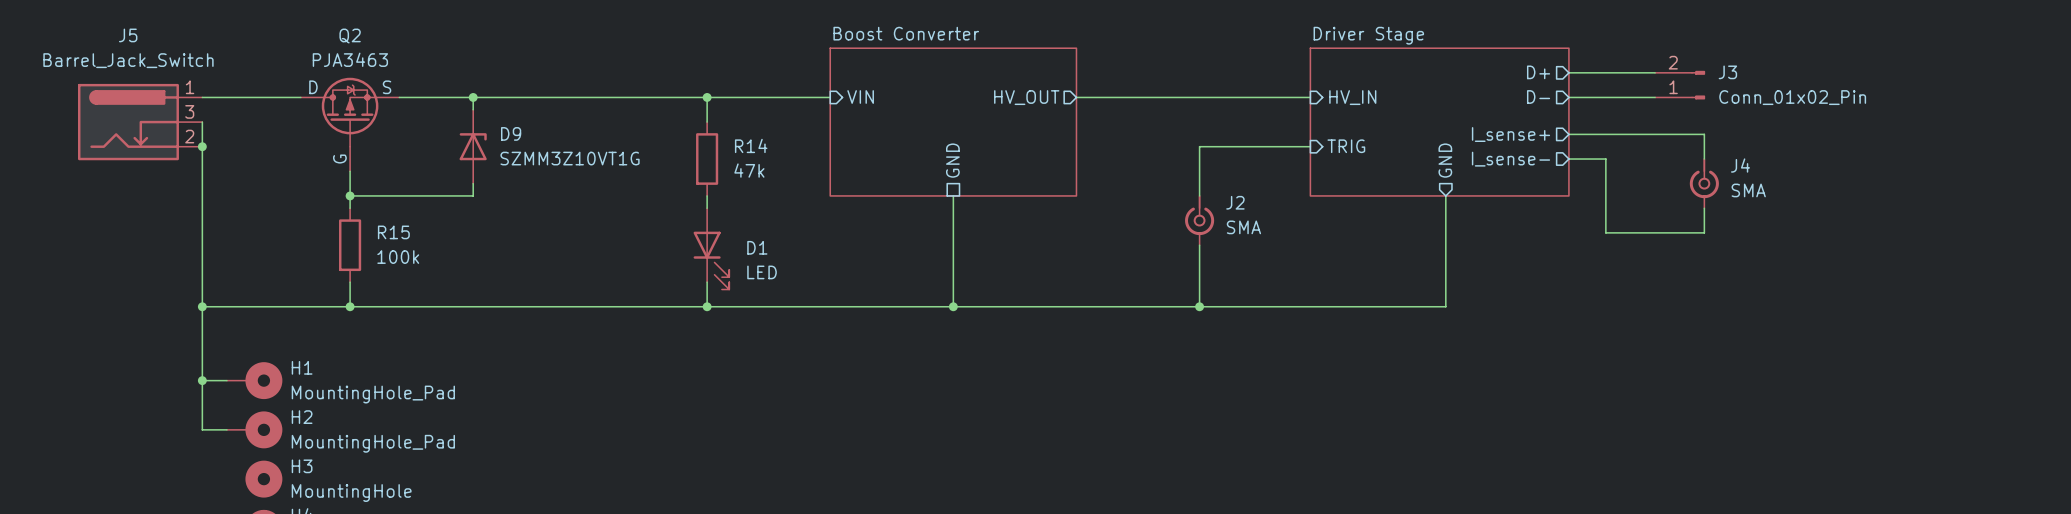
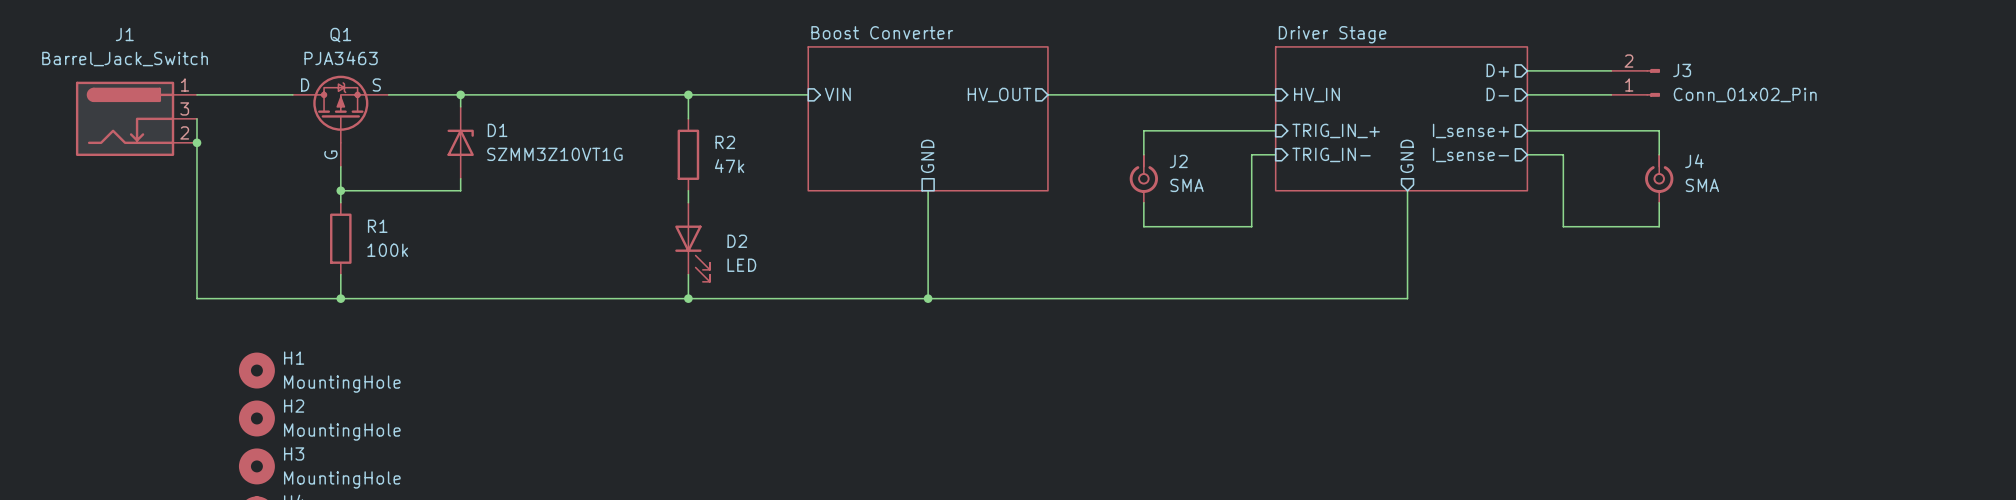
J5 name: J5 (128, 35) -> J1 (124, 34)
Q2 name: Q2 (350, 36) -> Q1 (340, 35)
D9 name: D9 (511, 133) -> D1 (497, 130)
wire: none -> (1275, 130) (1143, 130) (1143, 154)
sheet pin: none -> TRIG_IN_+ (1336, 130)
R14 name: R14 (751, 145) -> R2 (725, 142)
wire: (1310, 146) (1199, 146) (1199, 195) -> none
sheet pin: TRIG (1346, 146) -> none
wire: none -> (1275, 154) (1251, 154) (1251, 226) (1143, 226) (1143, 202)
sheet pin: none -> TRIG_IN- (1331, 154)
J2 position: (1199, 220) -> (1143, 178)
R15 name: R15 (393, 232) -> R1 (377, 226)
wire: (1199, 245) (1199, 306) -> none
D1 name: D1 (757, 247) -> D2 (737, 241)
wire: (202, 306) (202, 429) (226, 429) -> none
junction: (202, 306) -> none
junction: (1199, 306) -> none
H1 symbol: [226, 362, 283, 400] -> [238, 352, 275, 389]
wire: (202, 380) (226, 380) -> none
junction: (202, 380) -> none
H1 value: MountingHole_Pad (373, 394) -> MountingHole (342, 384)
H2 symbol: [226, 411, 283, 449] -> [238, 400, 275, 437]
H2 value: MountingHole_Pad (373, 443) -> MountingHole (342, 432)

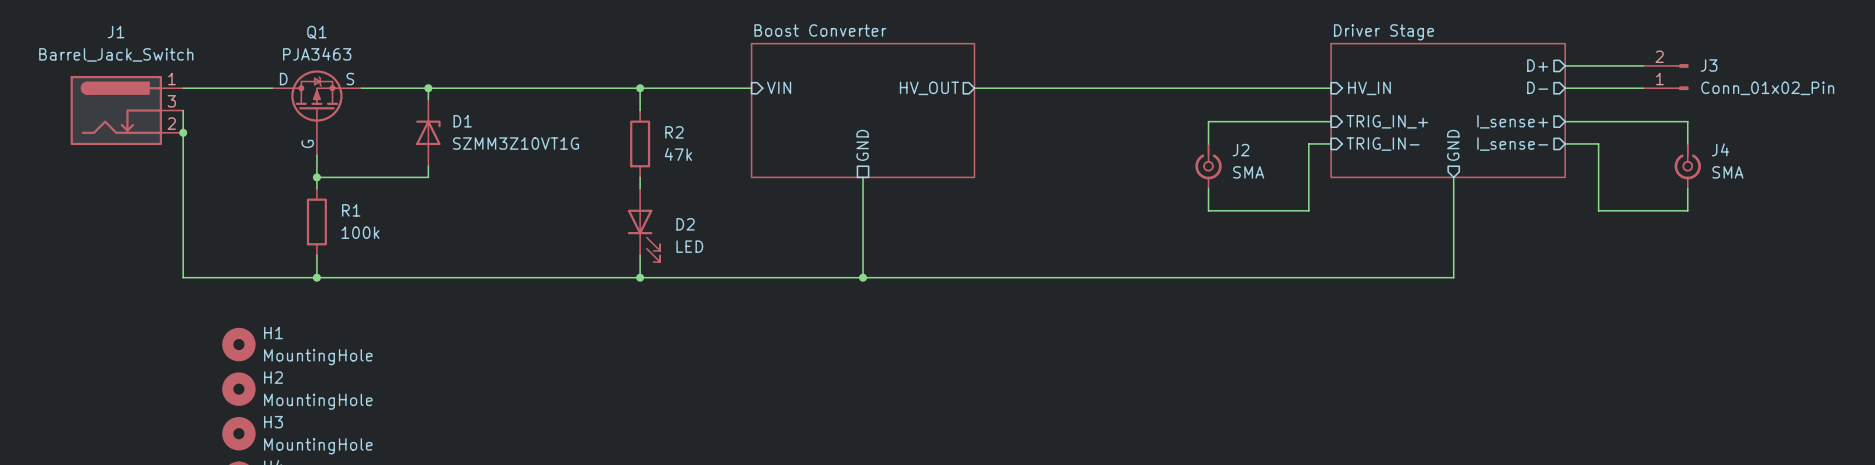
sheet pin position: D+ (1497, 70) -> D+ (1537, 65)
wire: (1527, 70) (1611, 70) -> (1565, 65) (1643, 65)
J3 position: (1635, 82) -> (1665, 77)
wire: none -> (1186, 88) (1331, 88)
sheet pin position: D- (1497, 94) -> D- (1537, 87)
wire: (1527, 94) (1611, 94) -> (1565, 88) (1643, 88)
sheet pin position: HV_IN (1316, 95) -> HV_IN (1369, 88)
sheet Driver Stage position: (1401, 118) -> (1448, 110)
wire: (1275, 130) (1143, 130) (1143, 154) -> (1331, 121) (1208, 121) (1208, 143)
sheet pin position: TRIG_IN_+ (1336, 130) -> TRIG_IN_+ (1387, 121)
sheet pin position: I_sense+ (1470, 130) -> I_sense+ (1512, 121)
wire: (1527, 130) (1659, 130) (1659, 154) -> (1565, 121) (1687, 121) (1687, 143)
wire: (1275, 154) (1251, 154) (1251, 226) (1143, 226) (1143, 202) -> none
sheet pin position: TRIG_IN- (1331, 154) -> TRIG_IN- (1383, 144)
wire: none -> (1331, 143) (1308, 143) (1308, 177)
sheet pin position: I_sense- (1470, 154) -> I_sense- (1512, 144)
wire: (1527, 154) (1563, 154) (1563, 190) -> none
wire: none -> (1565, 143) (1598, 143) (1598, 210) (1687, 210) (1687, 188)
sheet pin position: GND (1407, 156) -> GND (1453, 145)
J2 position: (1143, 178) -> (1208, 166)
J4 position: (1659, 178) -> (1687, 166)
wire: (1659, 202) (1659, 226) (1563, 226) -> (1308, 277) (1453, 277) (1453, 210)
wire: (1407, 226) (1407, 298) -> (1308, 210) (1208, 210) (1208, 188)

